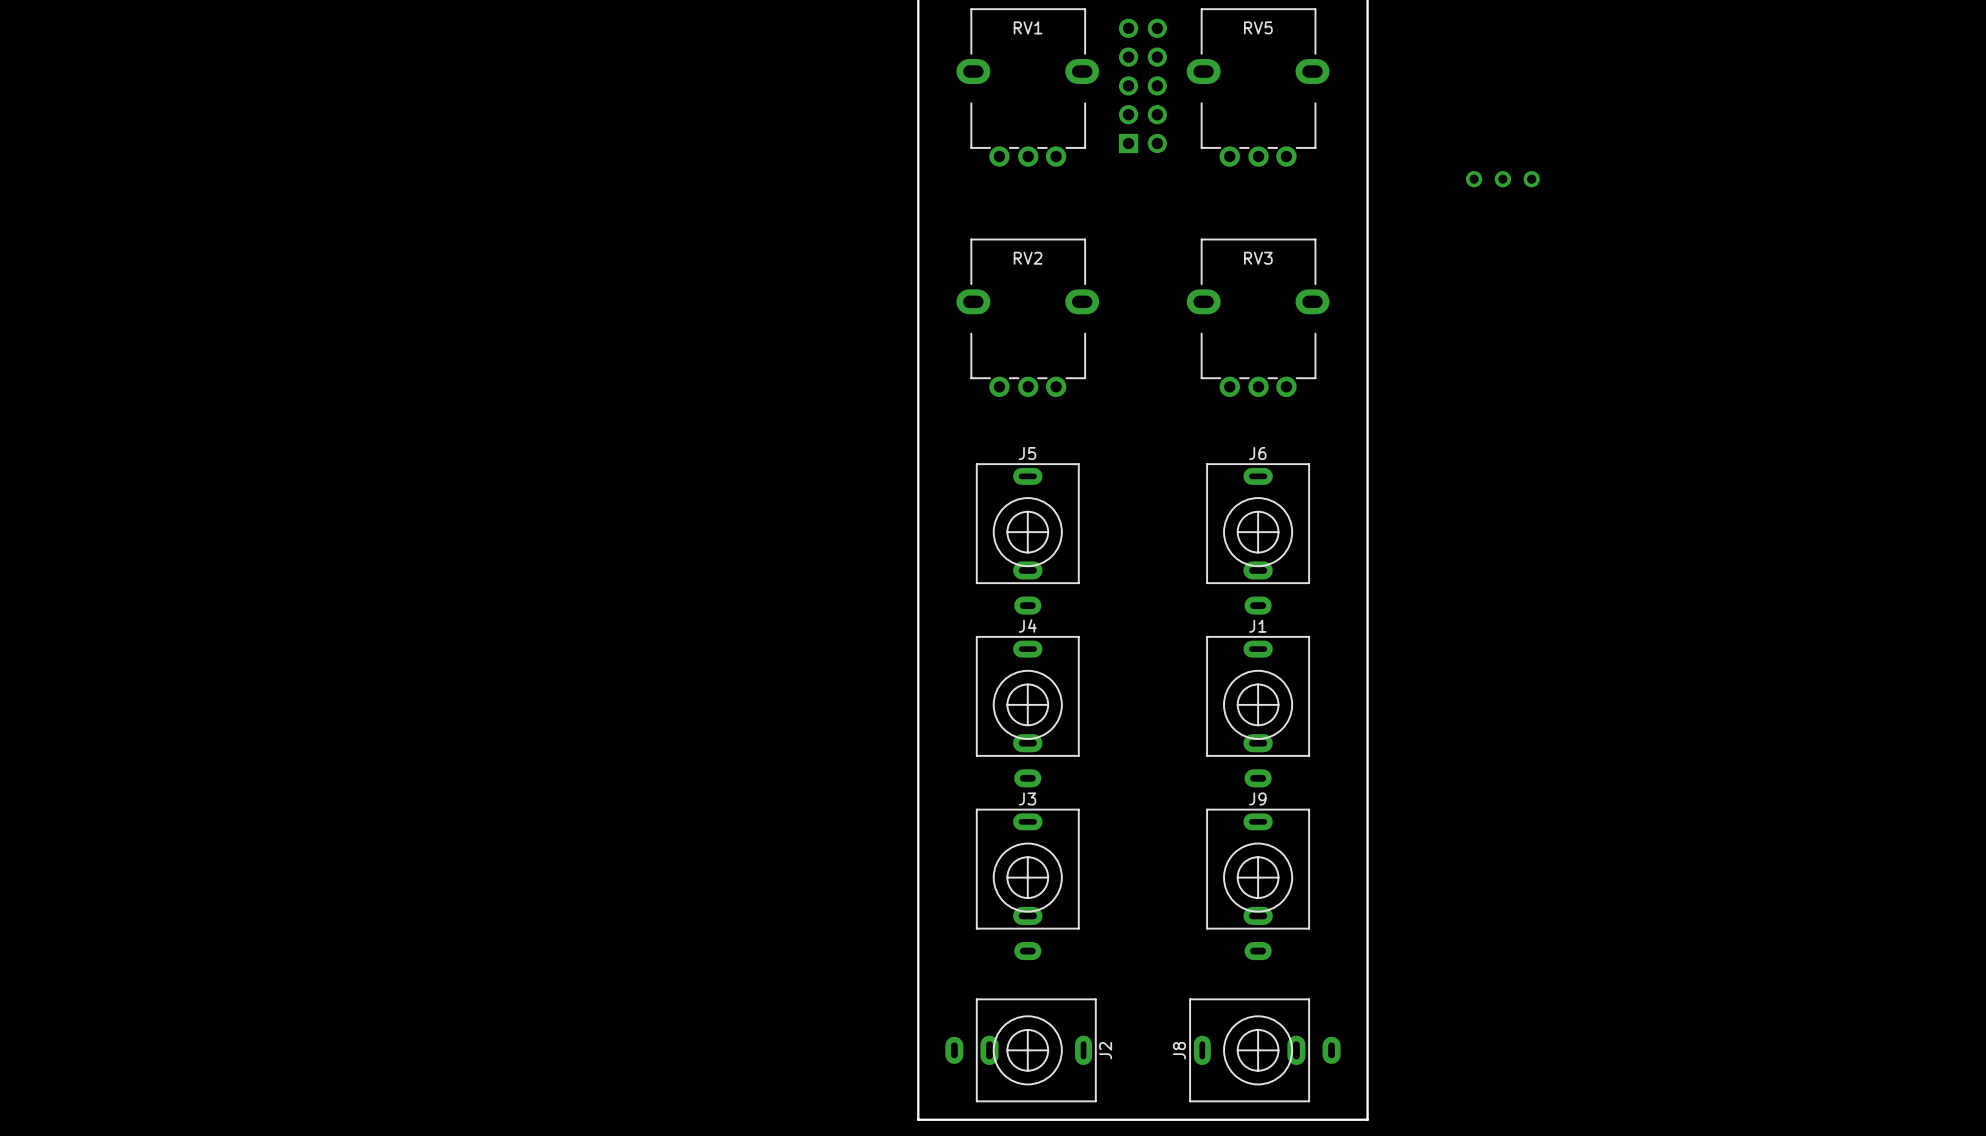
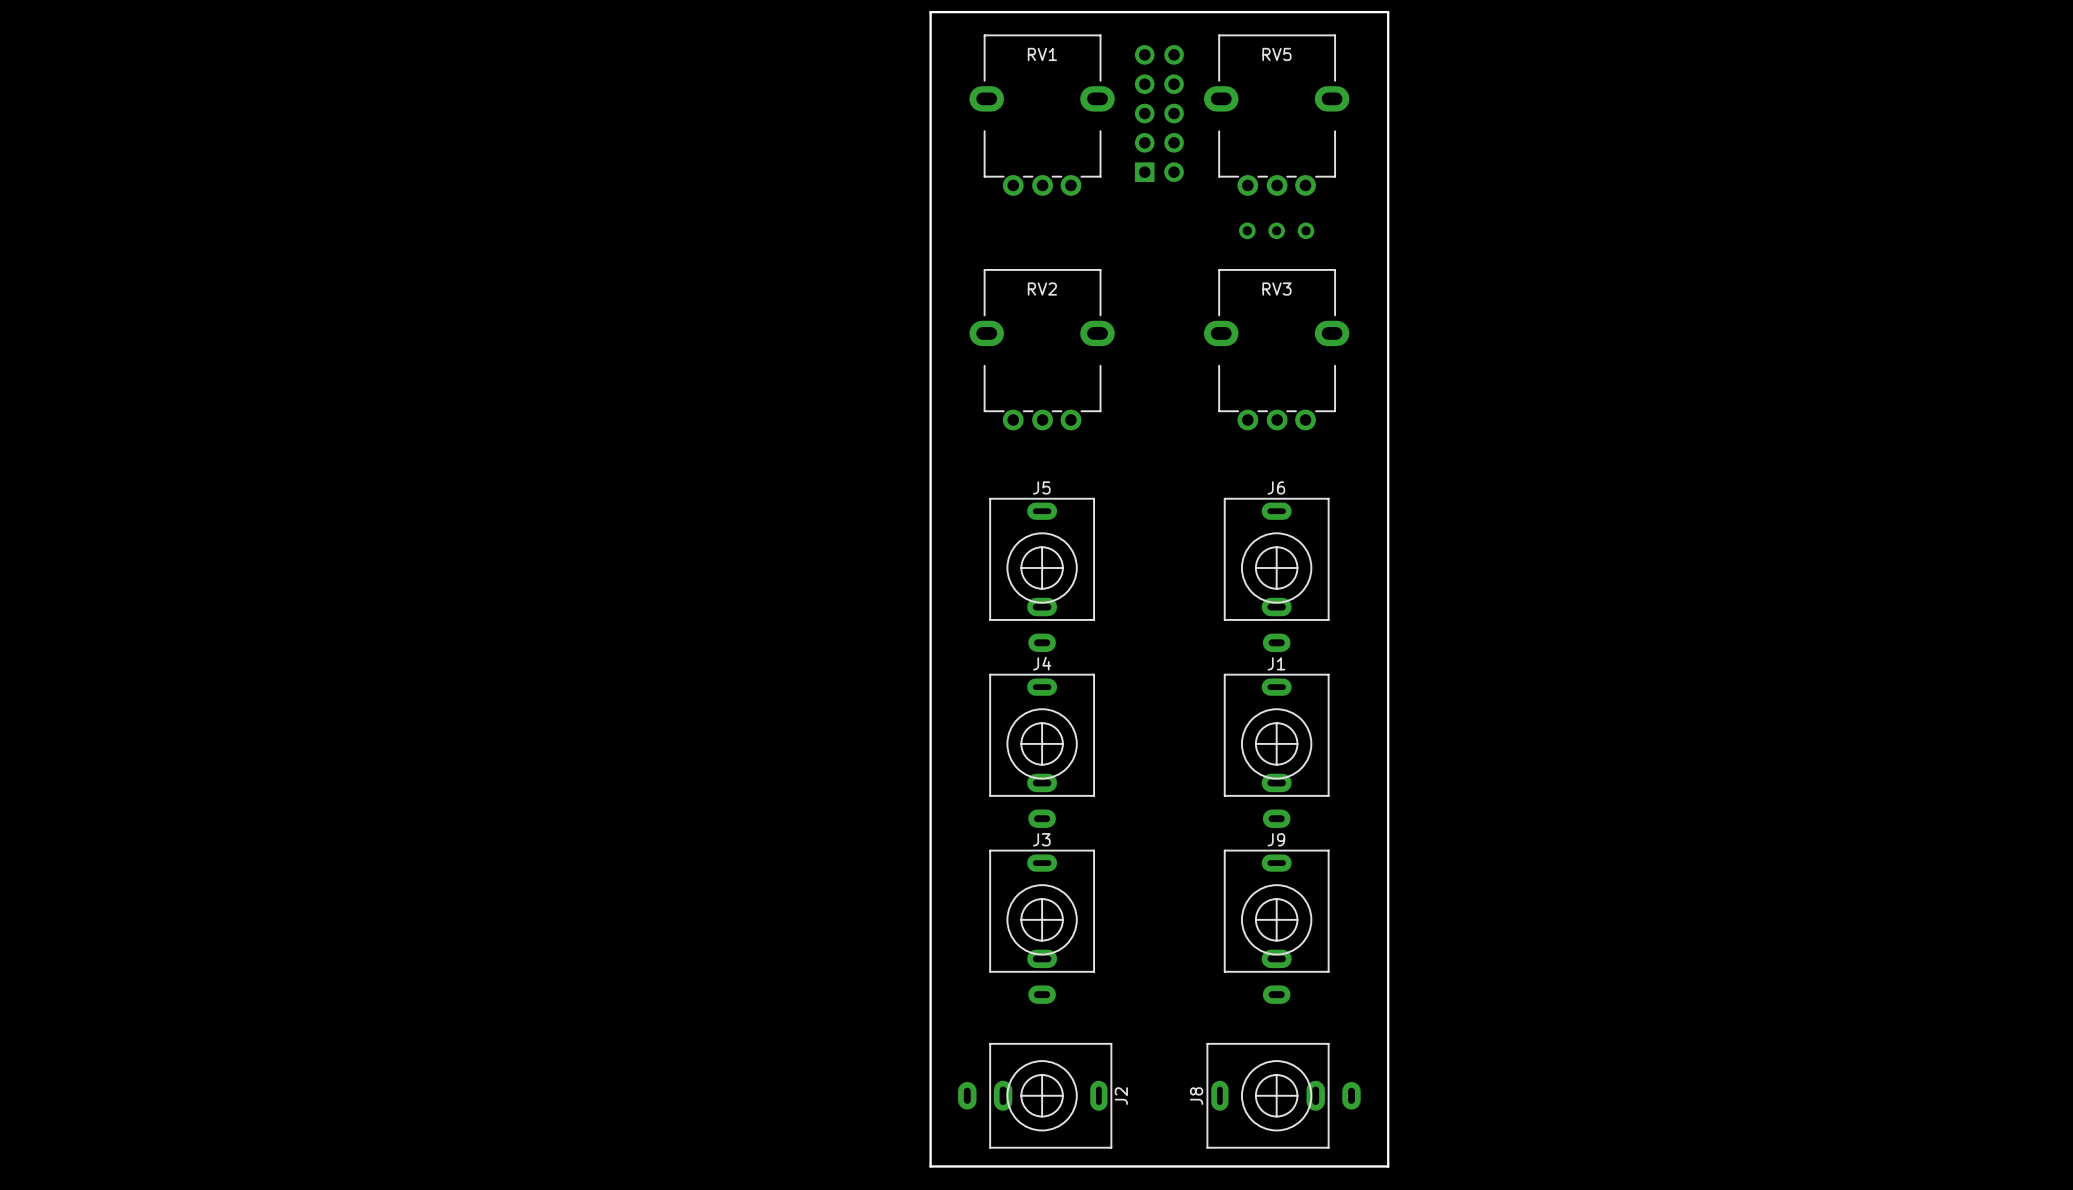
part position: (1502, 179) -> (1276, 230)

